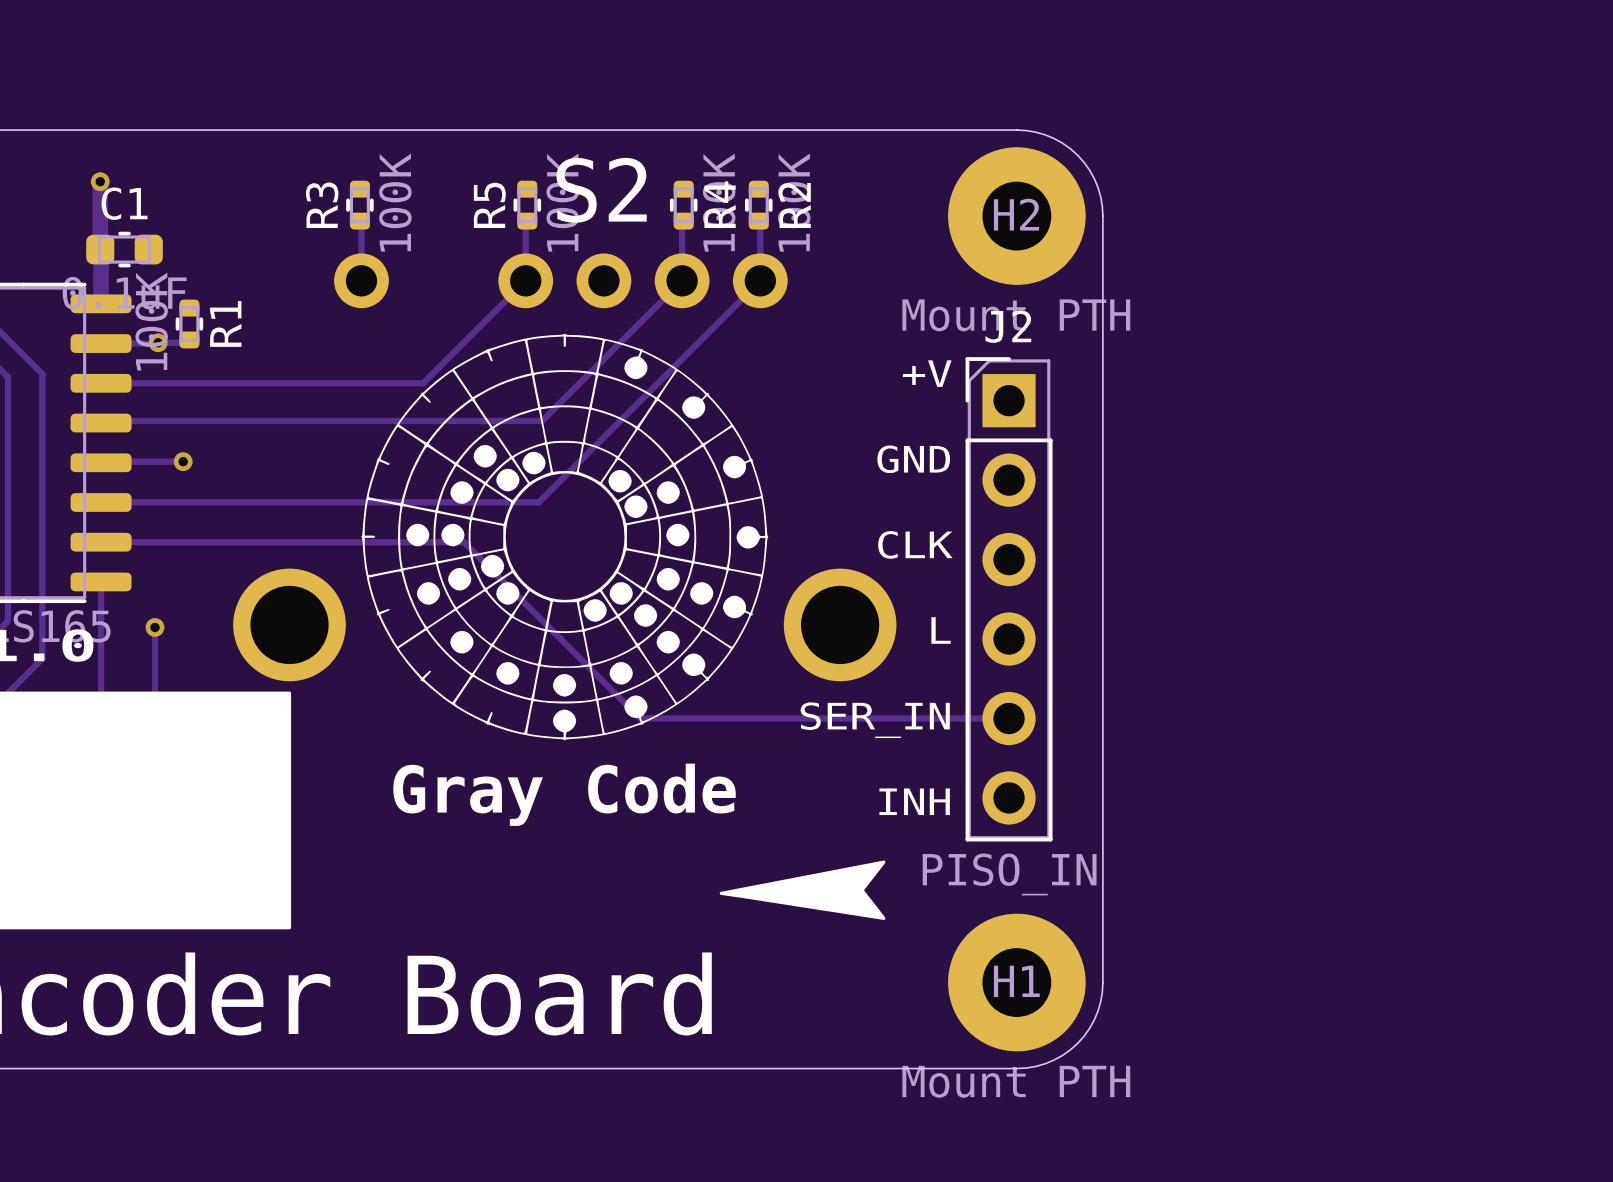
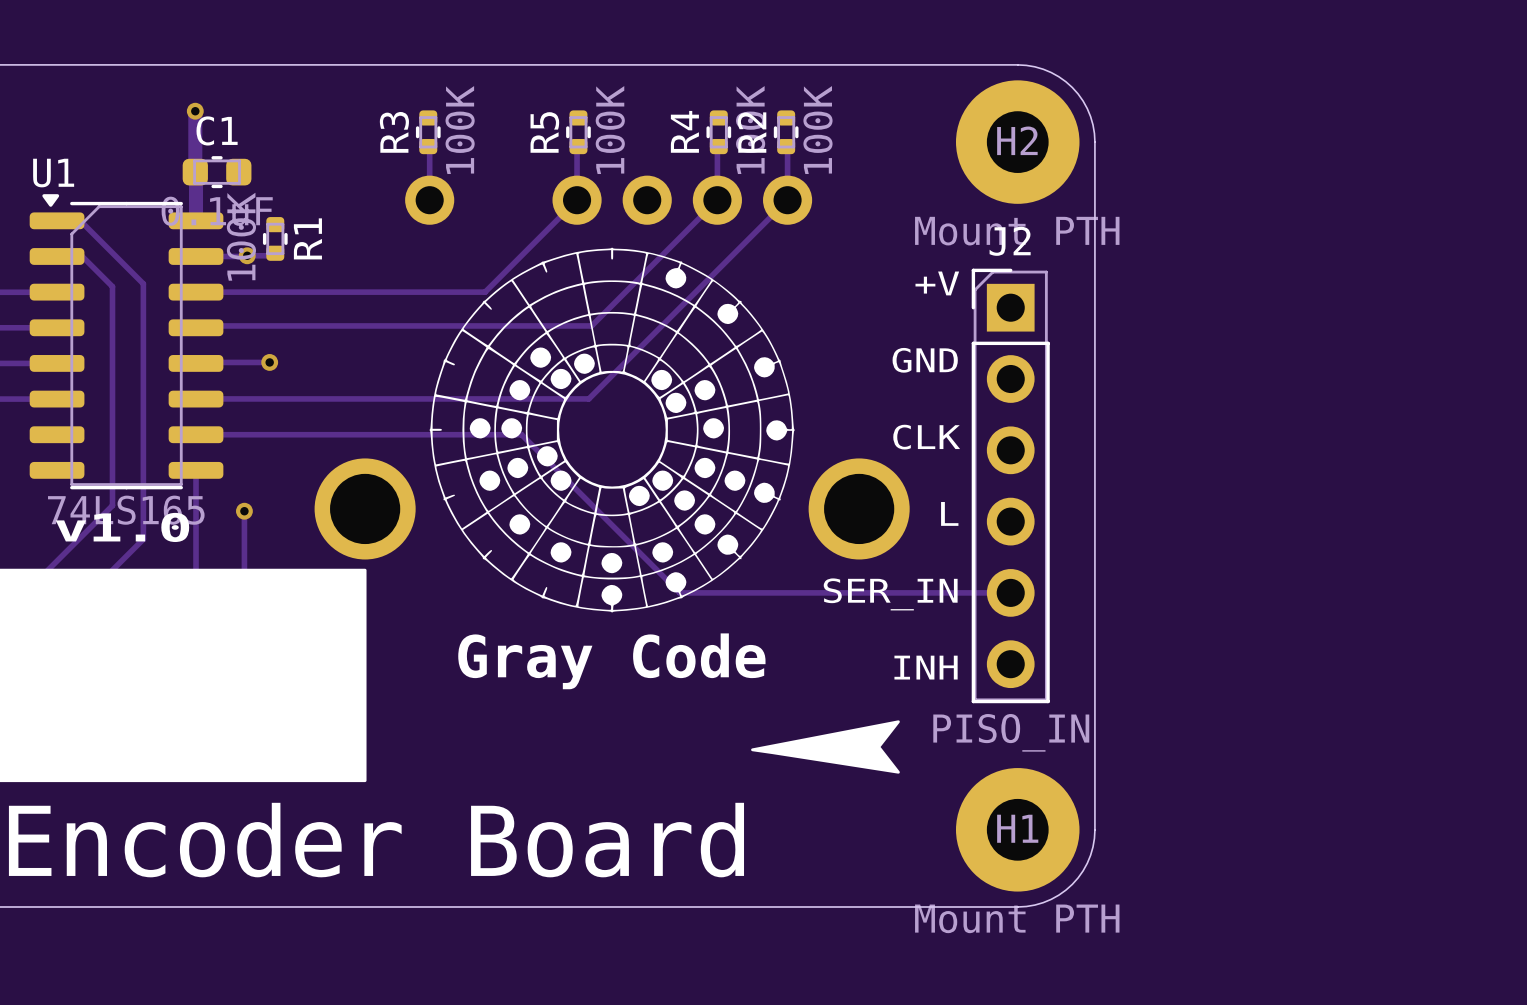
text: S2 (601, 190) -> none
R4 name position: R4 (720, 204) -> R4 (684, 131)
R2 name position: R2 (794, 205) -> R2 (752, 132)

